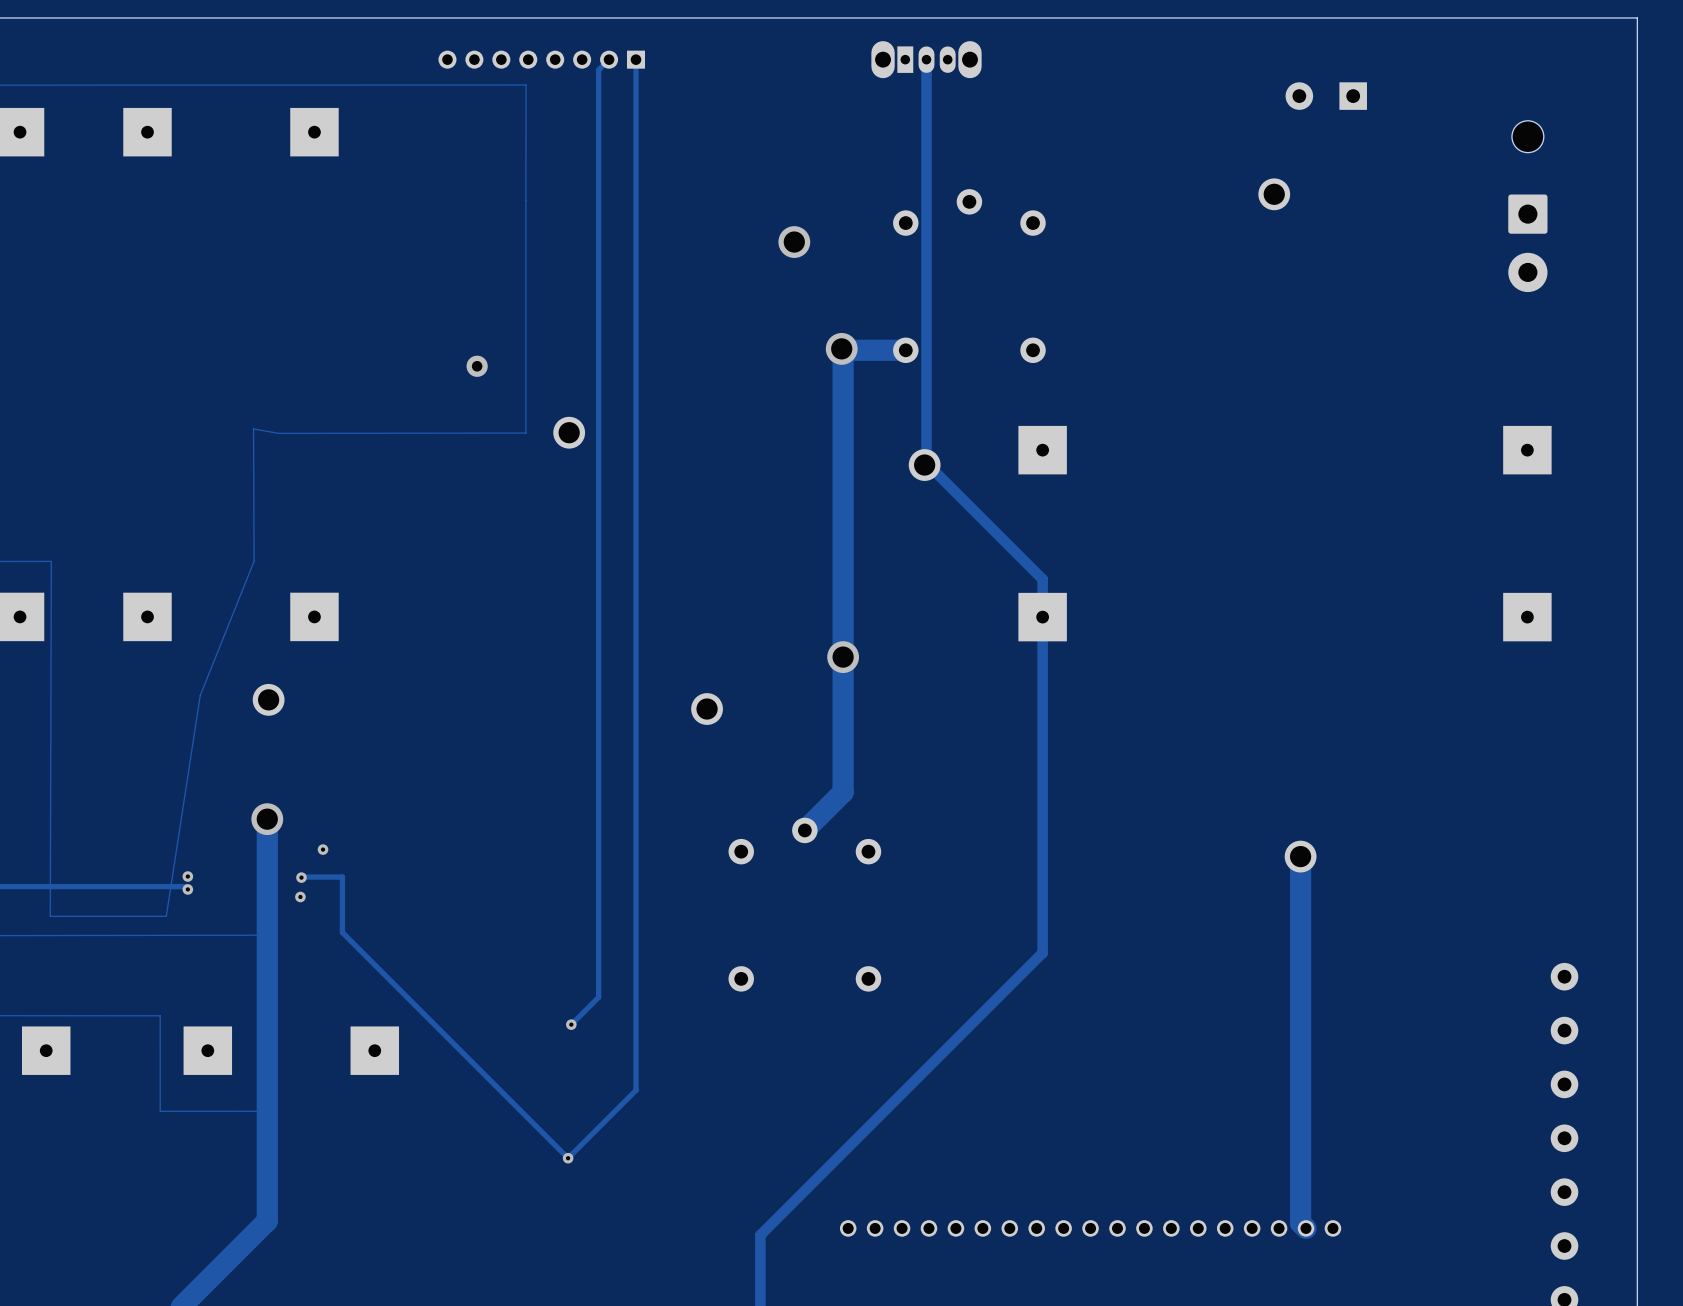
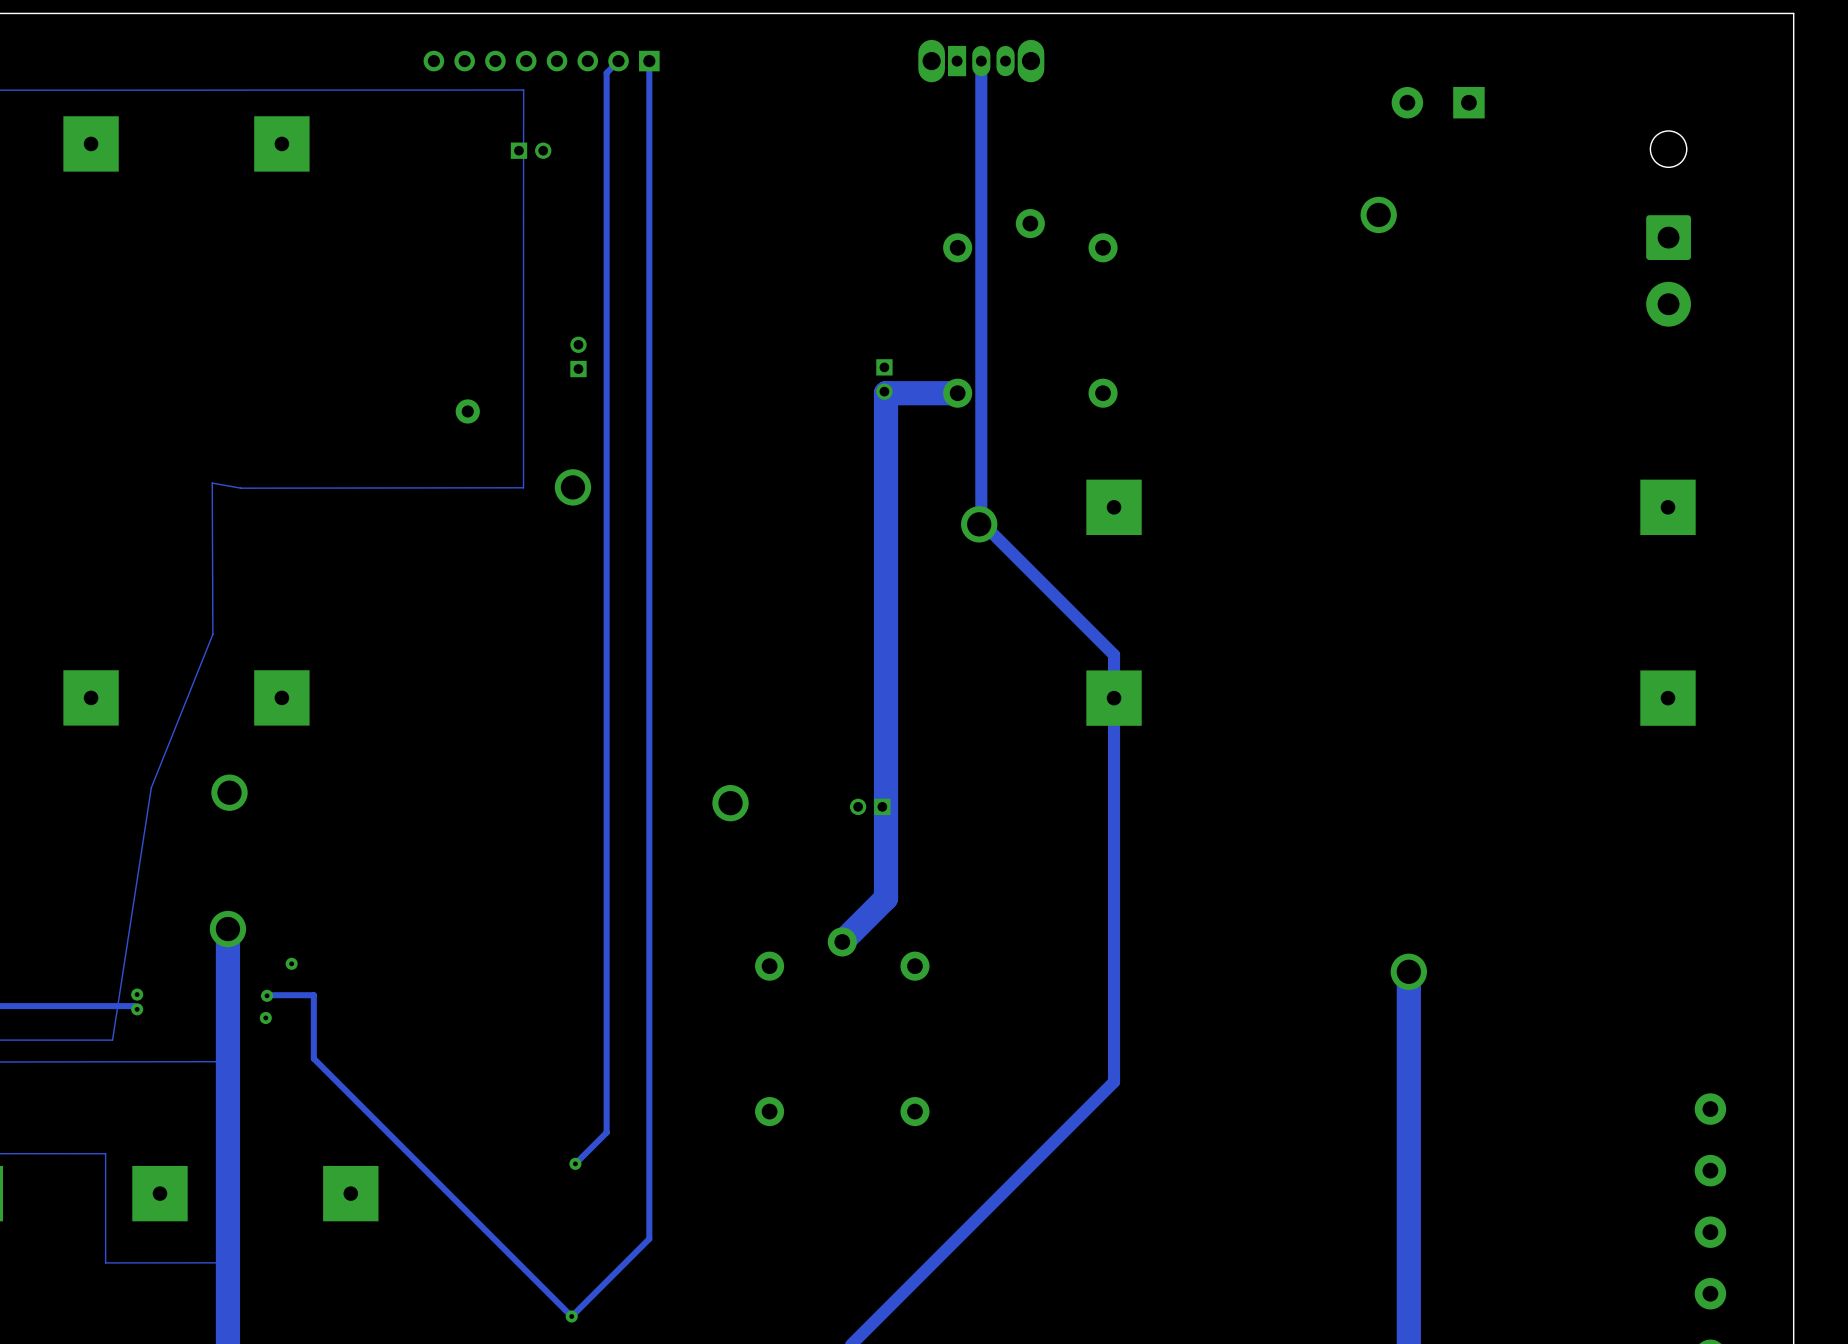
part: none -> (531, 150)
via: (794, 242) -> none
part: none -> (578, 356)
part: none -> (884, 379)
via: (841, 348) -> none
via: (843, 657) -> none
part: none -> (870, 806)

